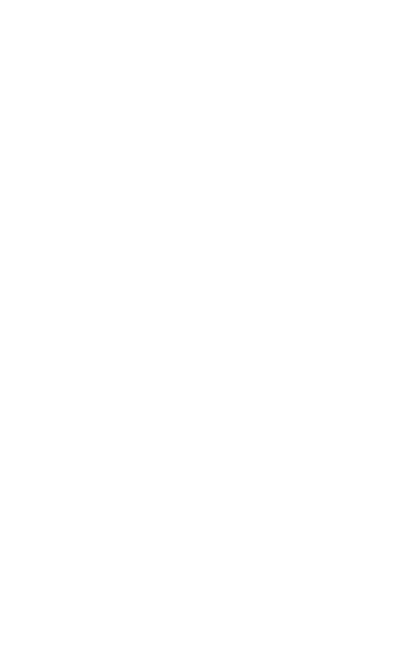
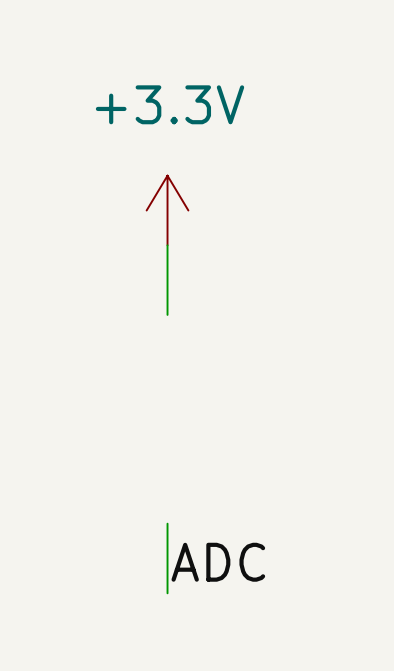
power symbol: none -> +3.3V (167, 210)
wire: none -> (167, 245) (167, 314)
wire: none -> (167, 523) (167, 593)
label: none -> ADC (218, 562)

